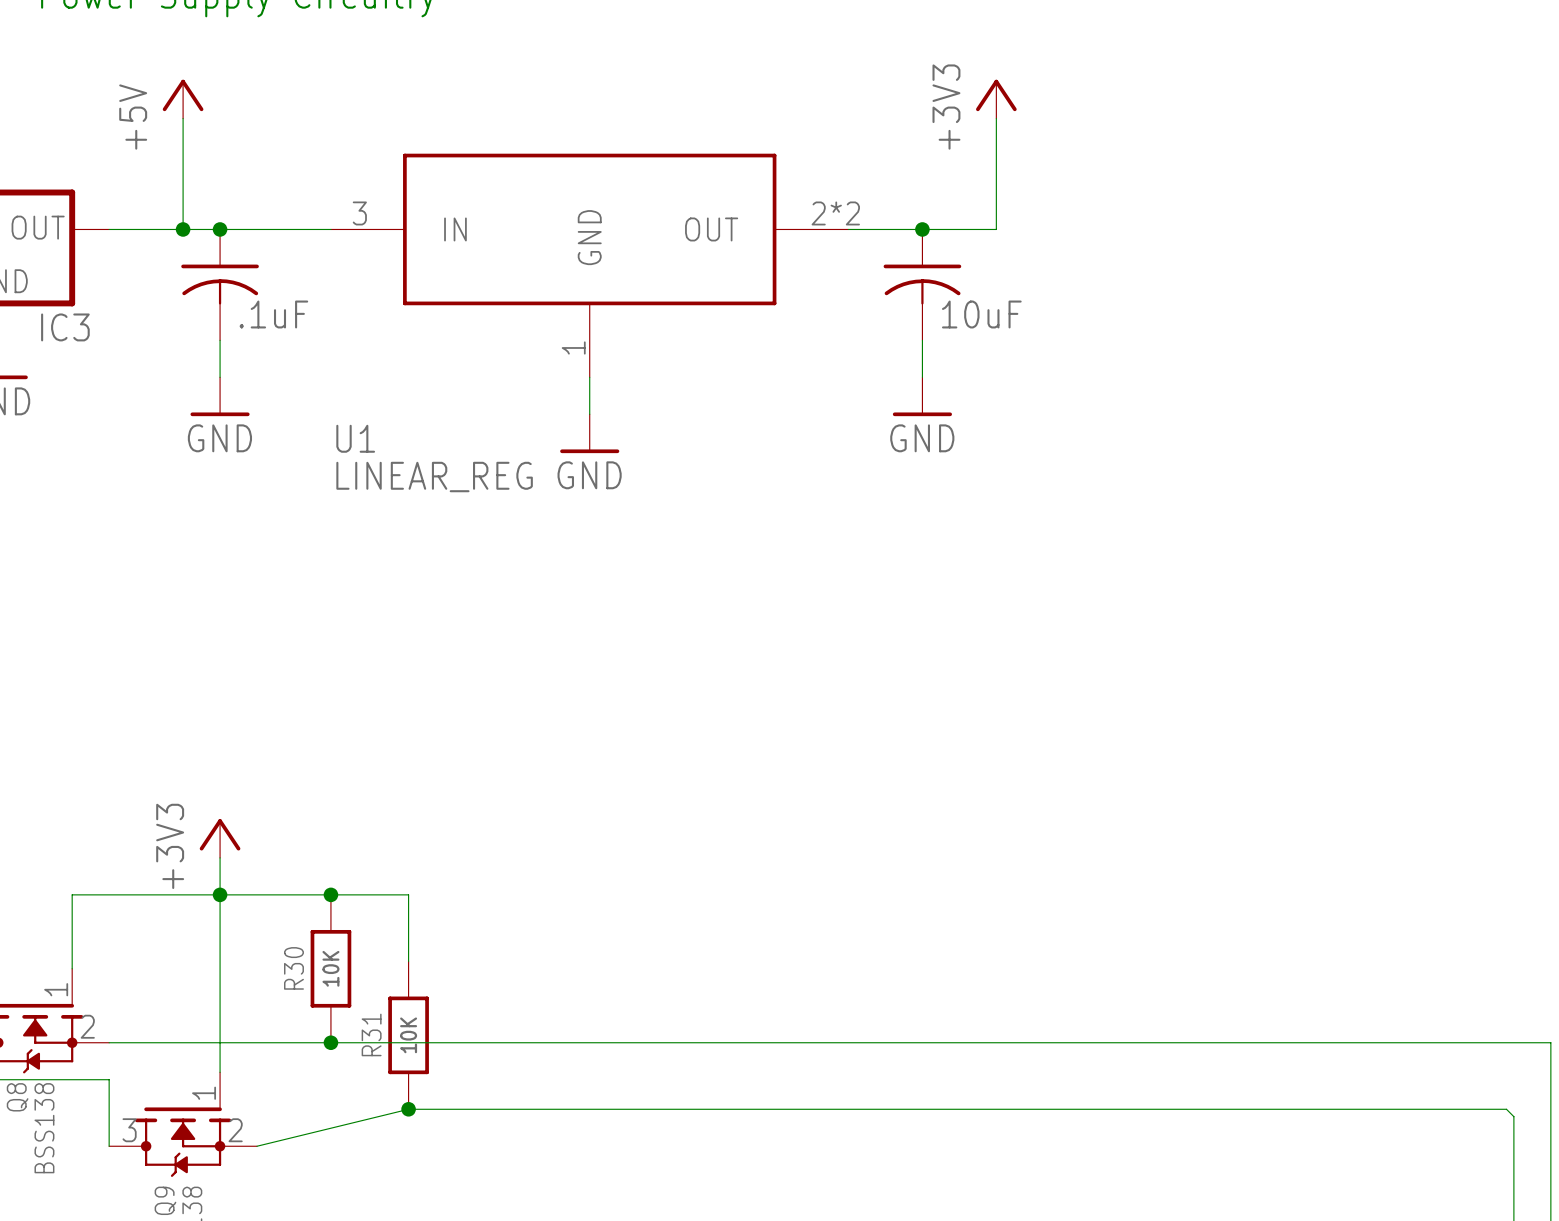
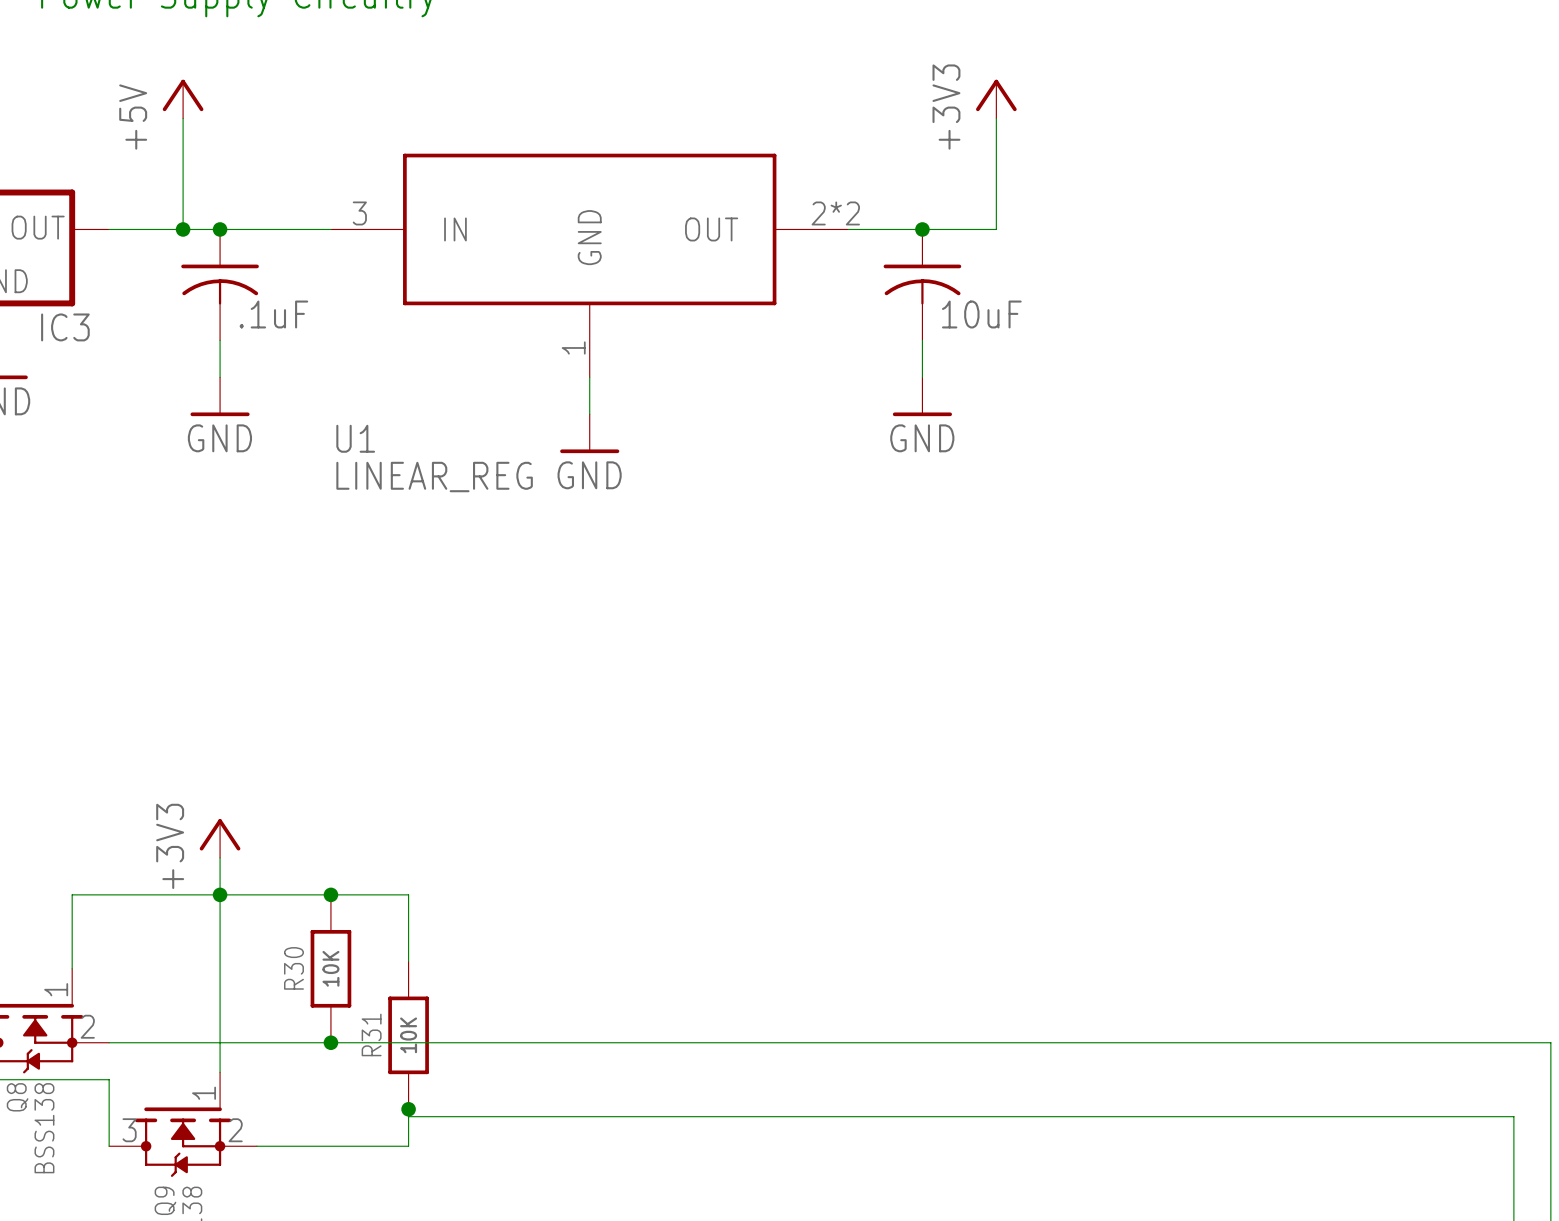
wire: none -> (408, 1109) (408, 1146) (257, 1146)
wire: (1513, 1116) (1506, 1109) (408, 1109) (257, 1146) -> (1513, 1116) (408, 1116)

